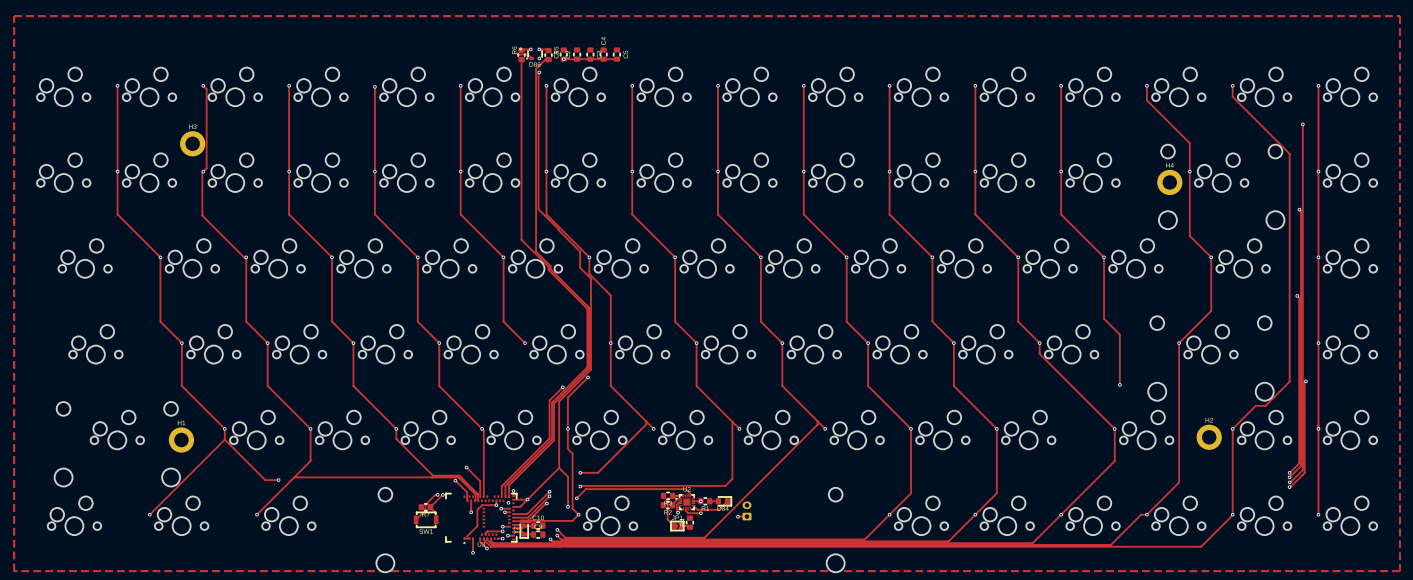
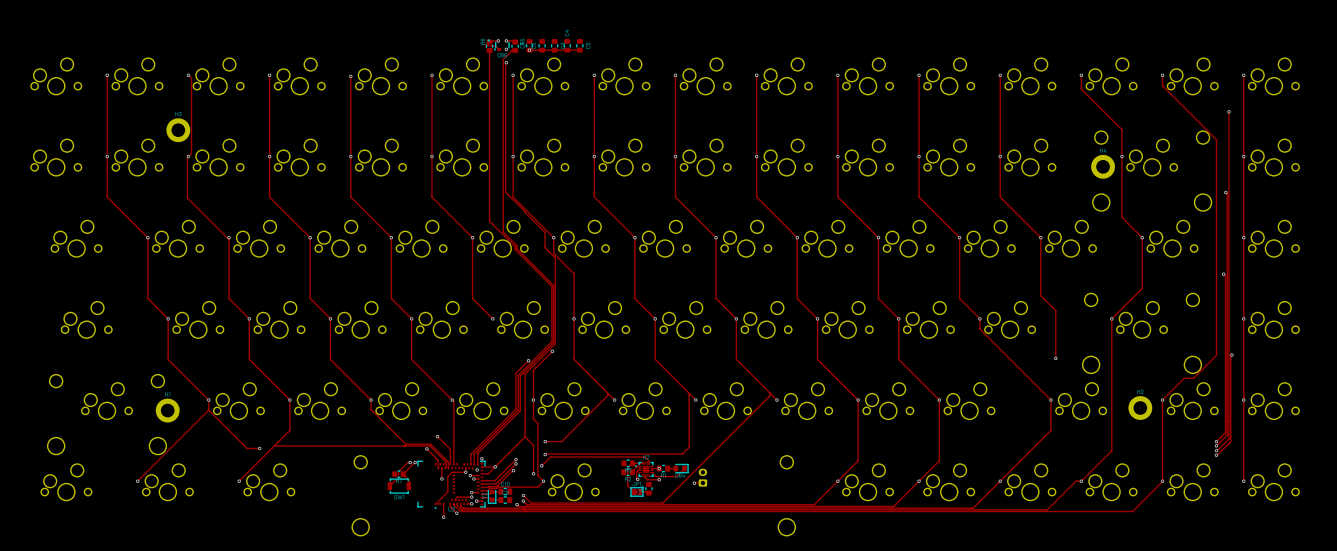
zone outline: (14, 16) (1399, 16) (1399, 571) (14, 571) (14, 16) -> none

